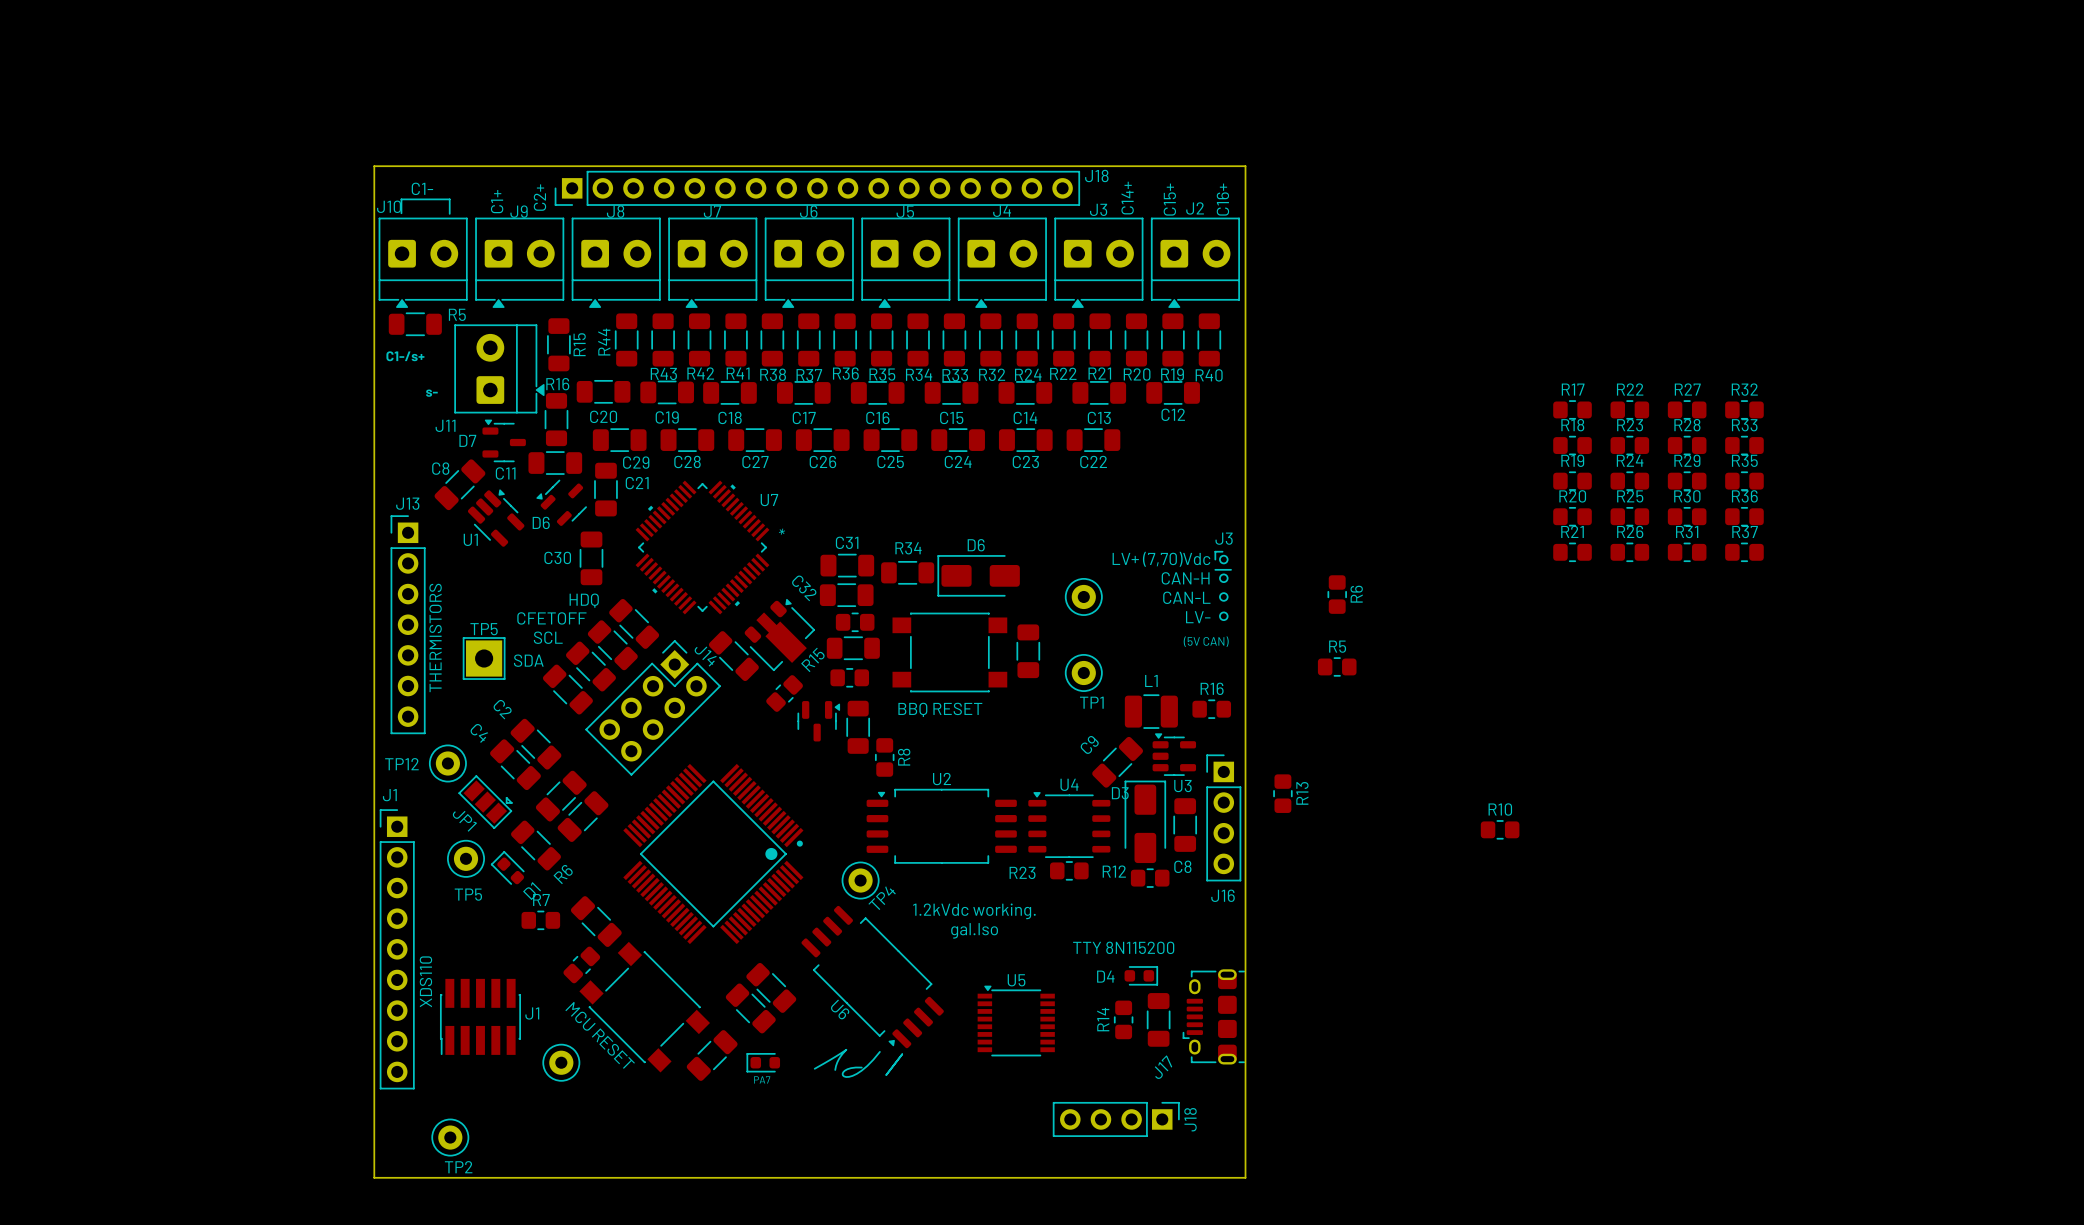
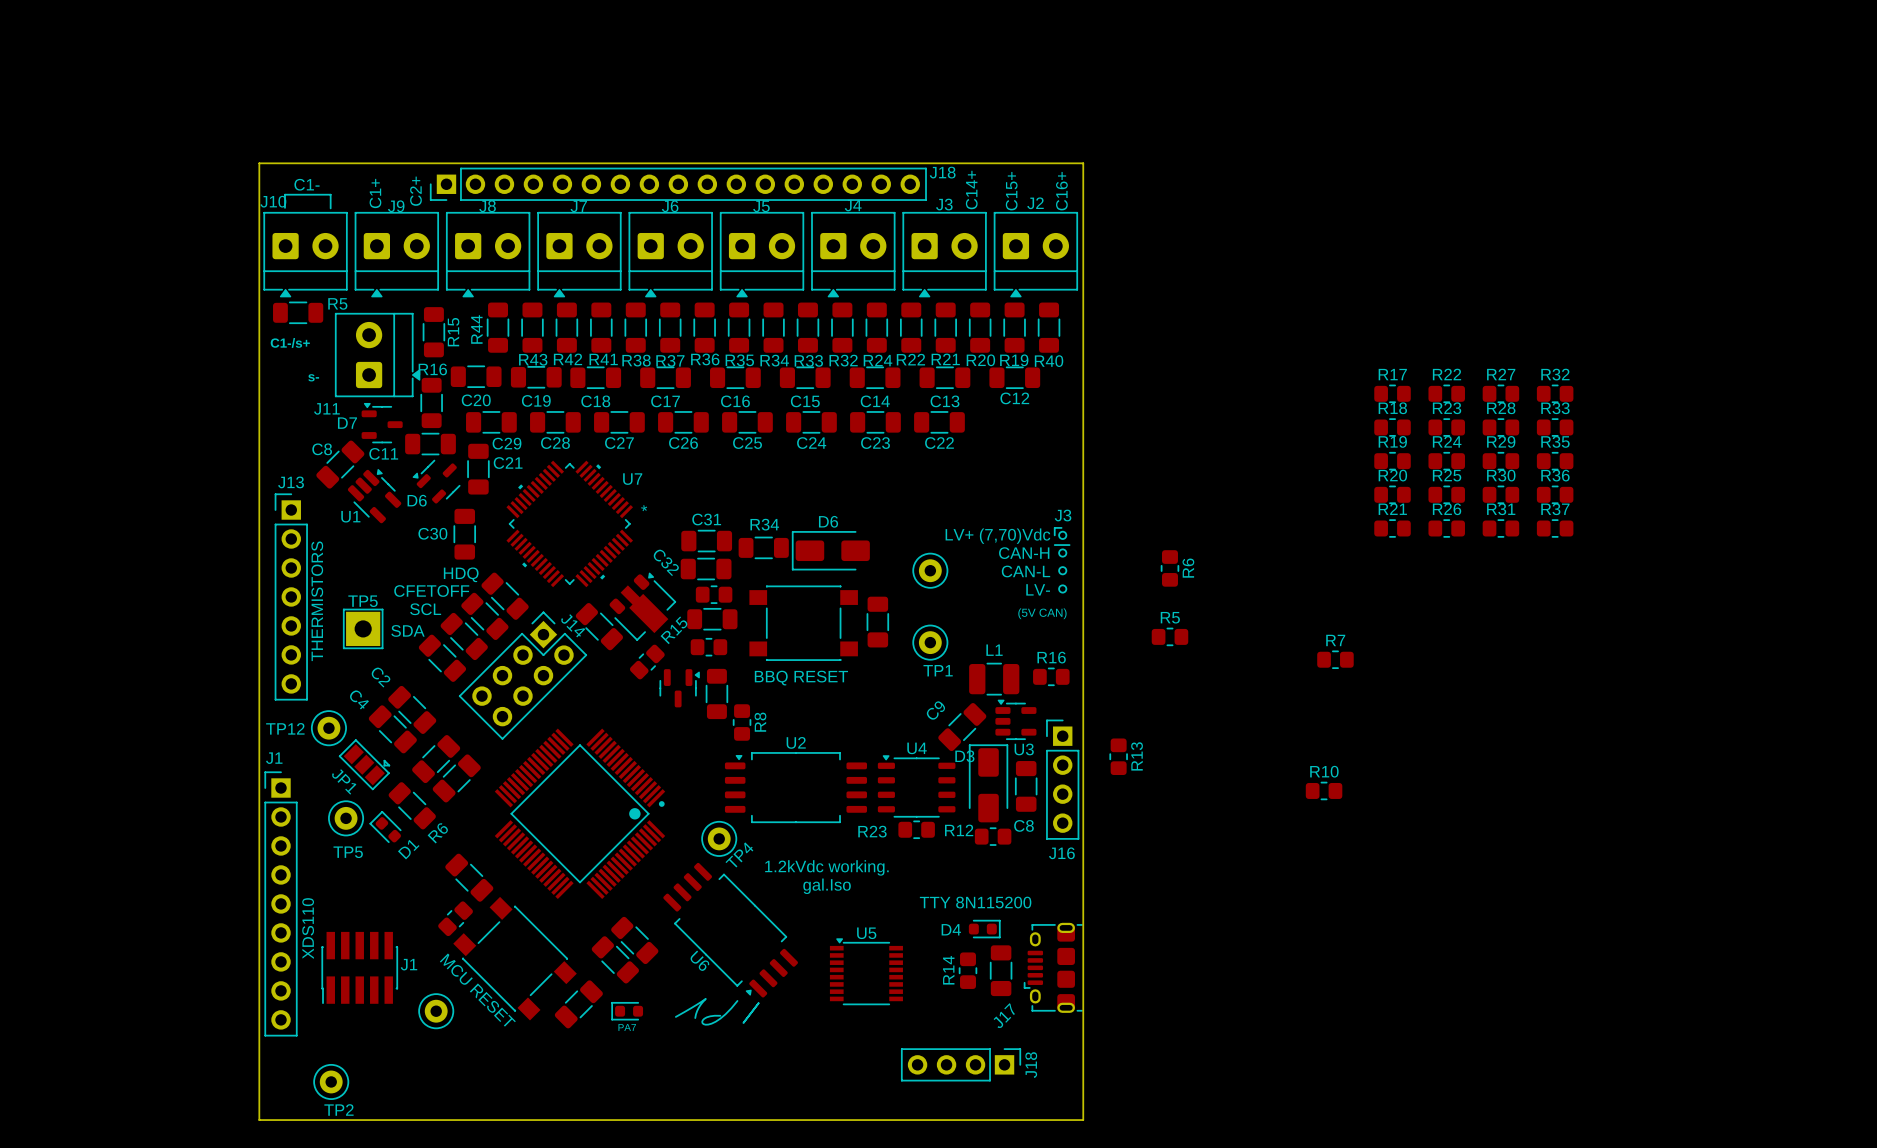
R7 position: (540, 920) -> (1335, 659)

